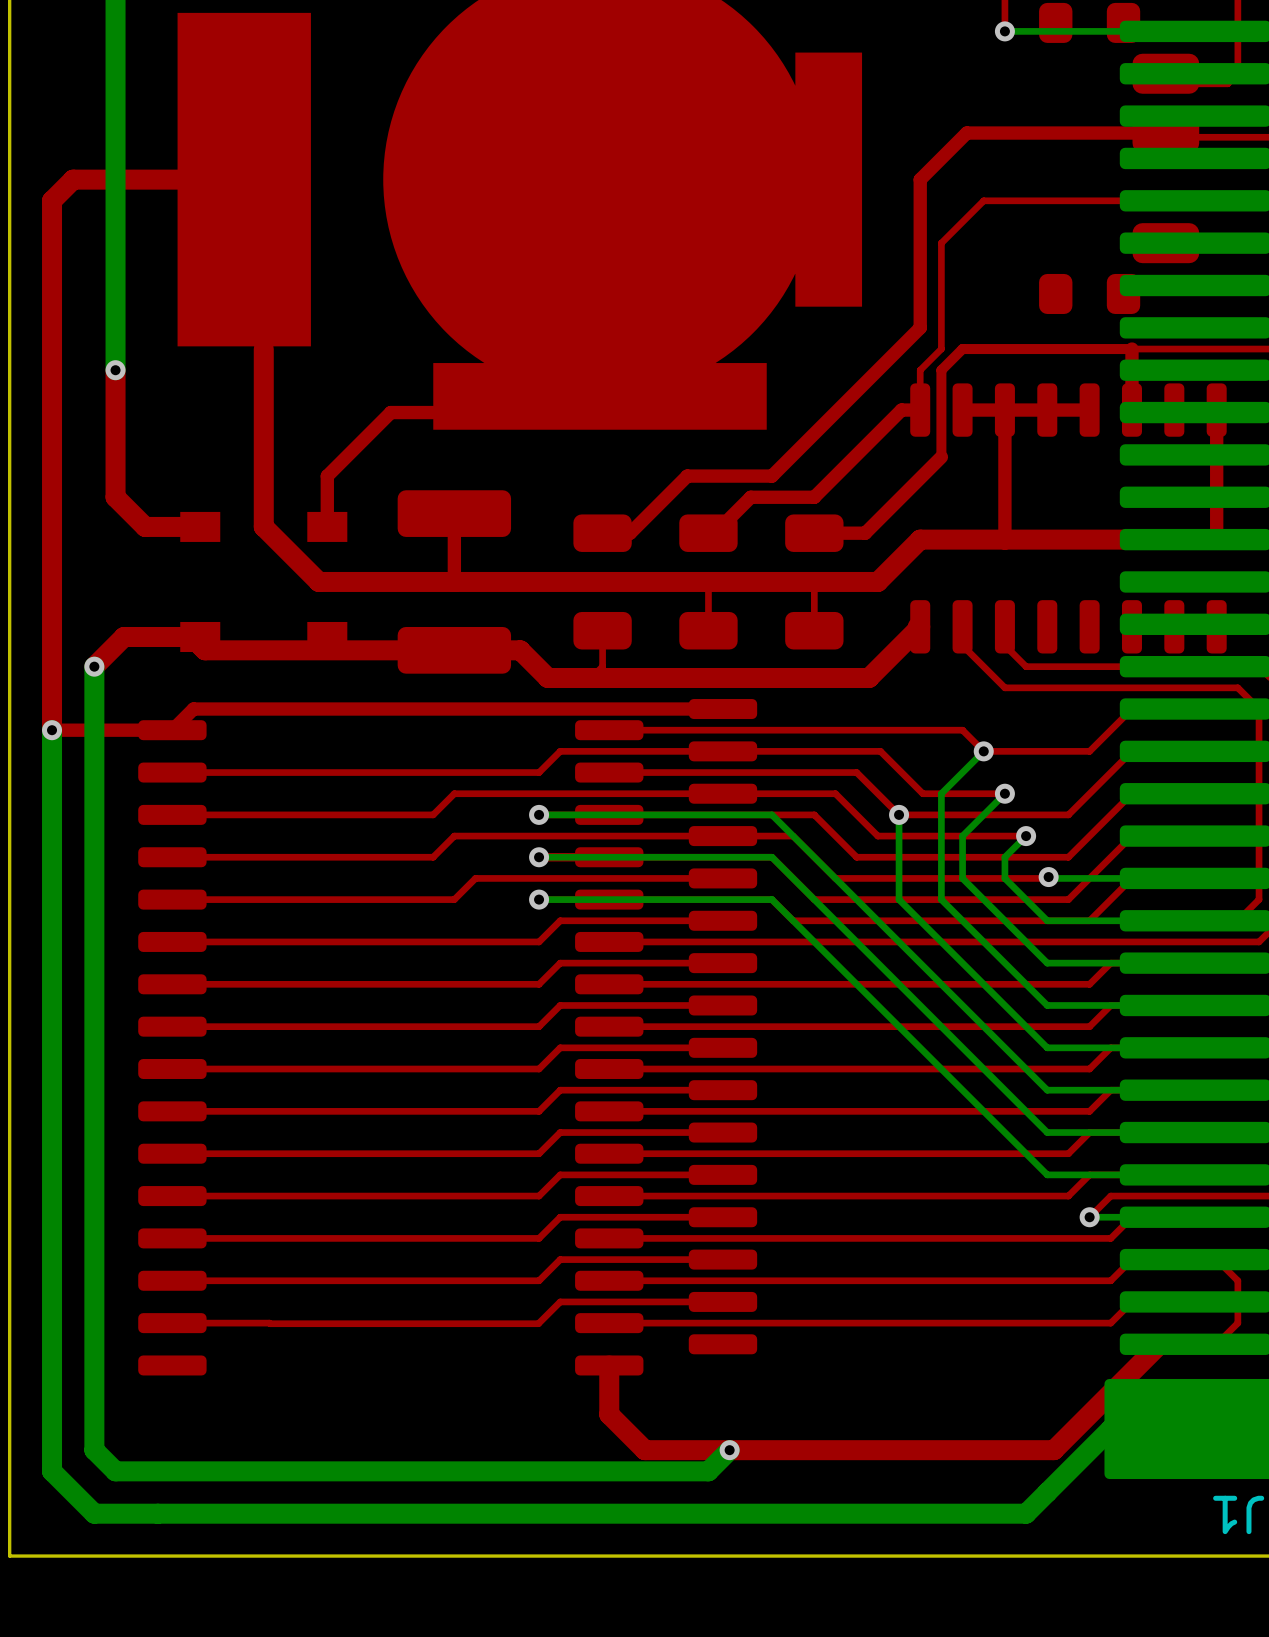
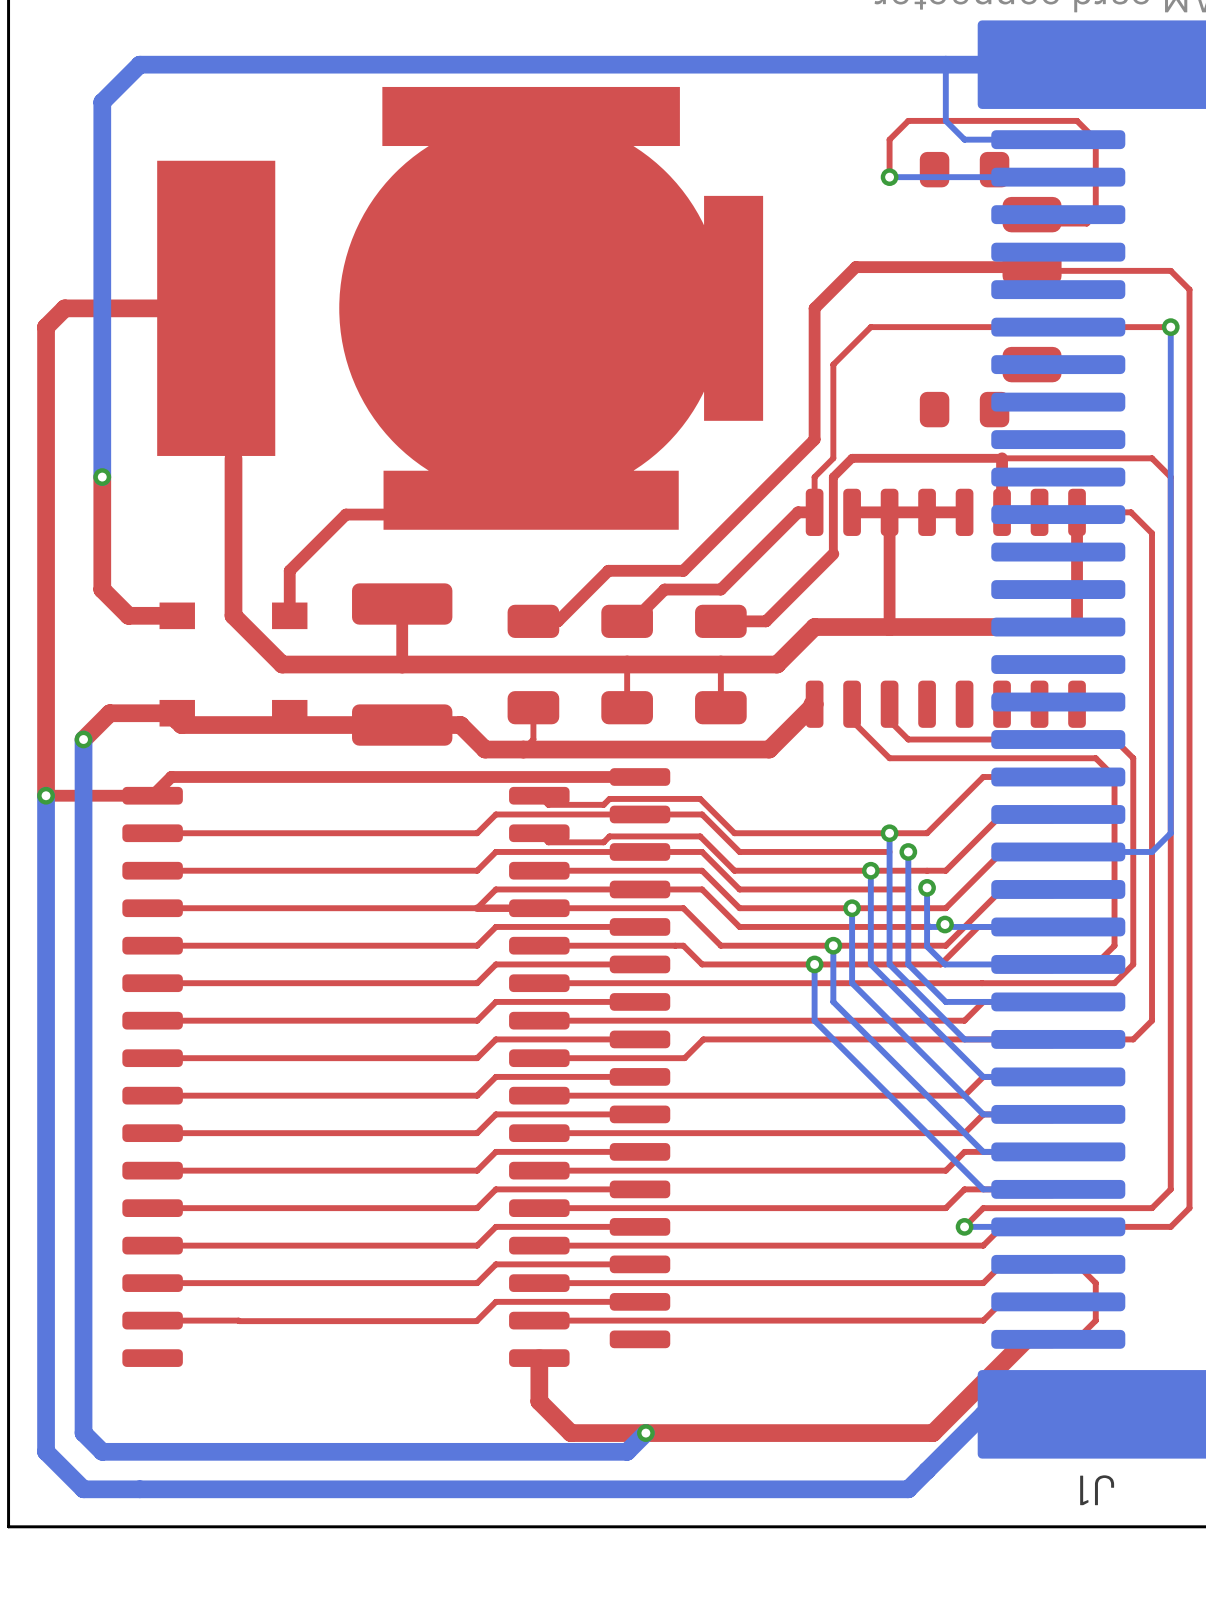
top track: (1131, 709) (1089, 751) (983, 751) (962, 730) (609, 730) -> (1002, 777) (983, 777) (927, 833) (758, 833)
top track: (793, 751) (880, 751) (922, 793) -> (702, 814) (739, 851) (816, 851)
bottom track: (983, 751) (941, 793) (941, 899) (1047, 1005) (1089, 1005) -> none
via: (983, 751) -> none
top track: (829, 772) (609, 772) -> (734, 833) (700, 798) (609, 798) (603, 804) (548, 804) (539, 795)
top track: (856, 772) (899, 814) -> (539, 833) (548, 842) (603, 842) (609, 836) (700, 836) (734, 870) (795, 870)
via: none -> (889, 833)
top track: (560, 793) (454, 793) (433, 814) -> (495, 851) (477, 870) (383, 870)
top track: (793, 793) (835, 793) (877, 836) -> none
bottom track: (1004, 793) (962, 836) (962, 857) -> none
via: (1004, 793) -> none
bottom track: none -> (908, 851) (908, 964) (945, 1001)
via: none -> (908, 851)
bottom track: (539, 814) (771, 814) (1047, 1090) (1110, 1090) -> (852, 926) (852, 983) (983, 1114)
via: (539, 814) -> none
top track: none -> (702, 870) (739, 908) (758, 908)
top track: (814, 814) (793, 814) -> (720, 870) (702, 851)
bottom track: (899, 814) (899, 899) (1047, 1047) (1110, 1047) -> (870, 870) (870, 964) (983, 1076)
via: (899, 814) -> none
via: none -> (870, 870)
via: none -> (927, 887)
top track: (560, 836) (454, 836) (433, 857) -> (495, 889) (477, 908) (383, 908)
top track: (835, 836) (856, 857) -> (739, 889) (777, 889)
bottom track: (1026, 836) (1004, 857) -> (889, 833) (889, 908)
via: (1026, 836) -> none
bottom track: (539, 857) (771, 857) (1047, 1132) (1110, 1132) -> (833, 945) (833, 1001) (983, 1151)
via: (539, 857) -> none
via: none -> (852, 908)
via position: (1048, 877) -> (945, 924)
top track: (560, 878) (475, 878) (454, 899) -> (495, 926) (477, 945) (402, 945)
bottom track: (962, 878) (1004, 920) -> (889, 926) (889, 964)
bottom track: (1004, 878) (1047, 920) (1067, 920) -> (927, 887) (927, 946) (945, 964)
top track: (1131, 878) (1089, 920) (1062, 920) -> (1002, 926) (978, 926) (940, 964)
bottom track: (539, 899) (771, 899) (1047, 1174) (1110, 1174) -> (814, 964) (814, 1020) (983, 1189)
via: (539, 899) -> none
via: none -> (833, 945)
via: none -> (814, 964)
bottom track: (1068, 963) (1047, 963) -> (964, 1039) (927, 1001)
top track: (1110, 1005) (1089, 1026) (773, 1026) -> (983, 1039) (703, 1039) (684, 1058)

